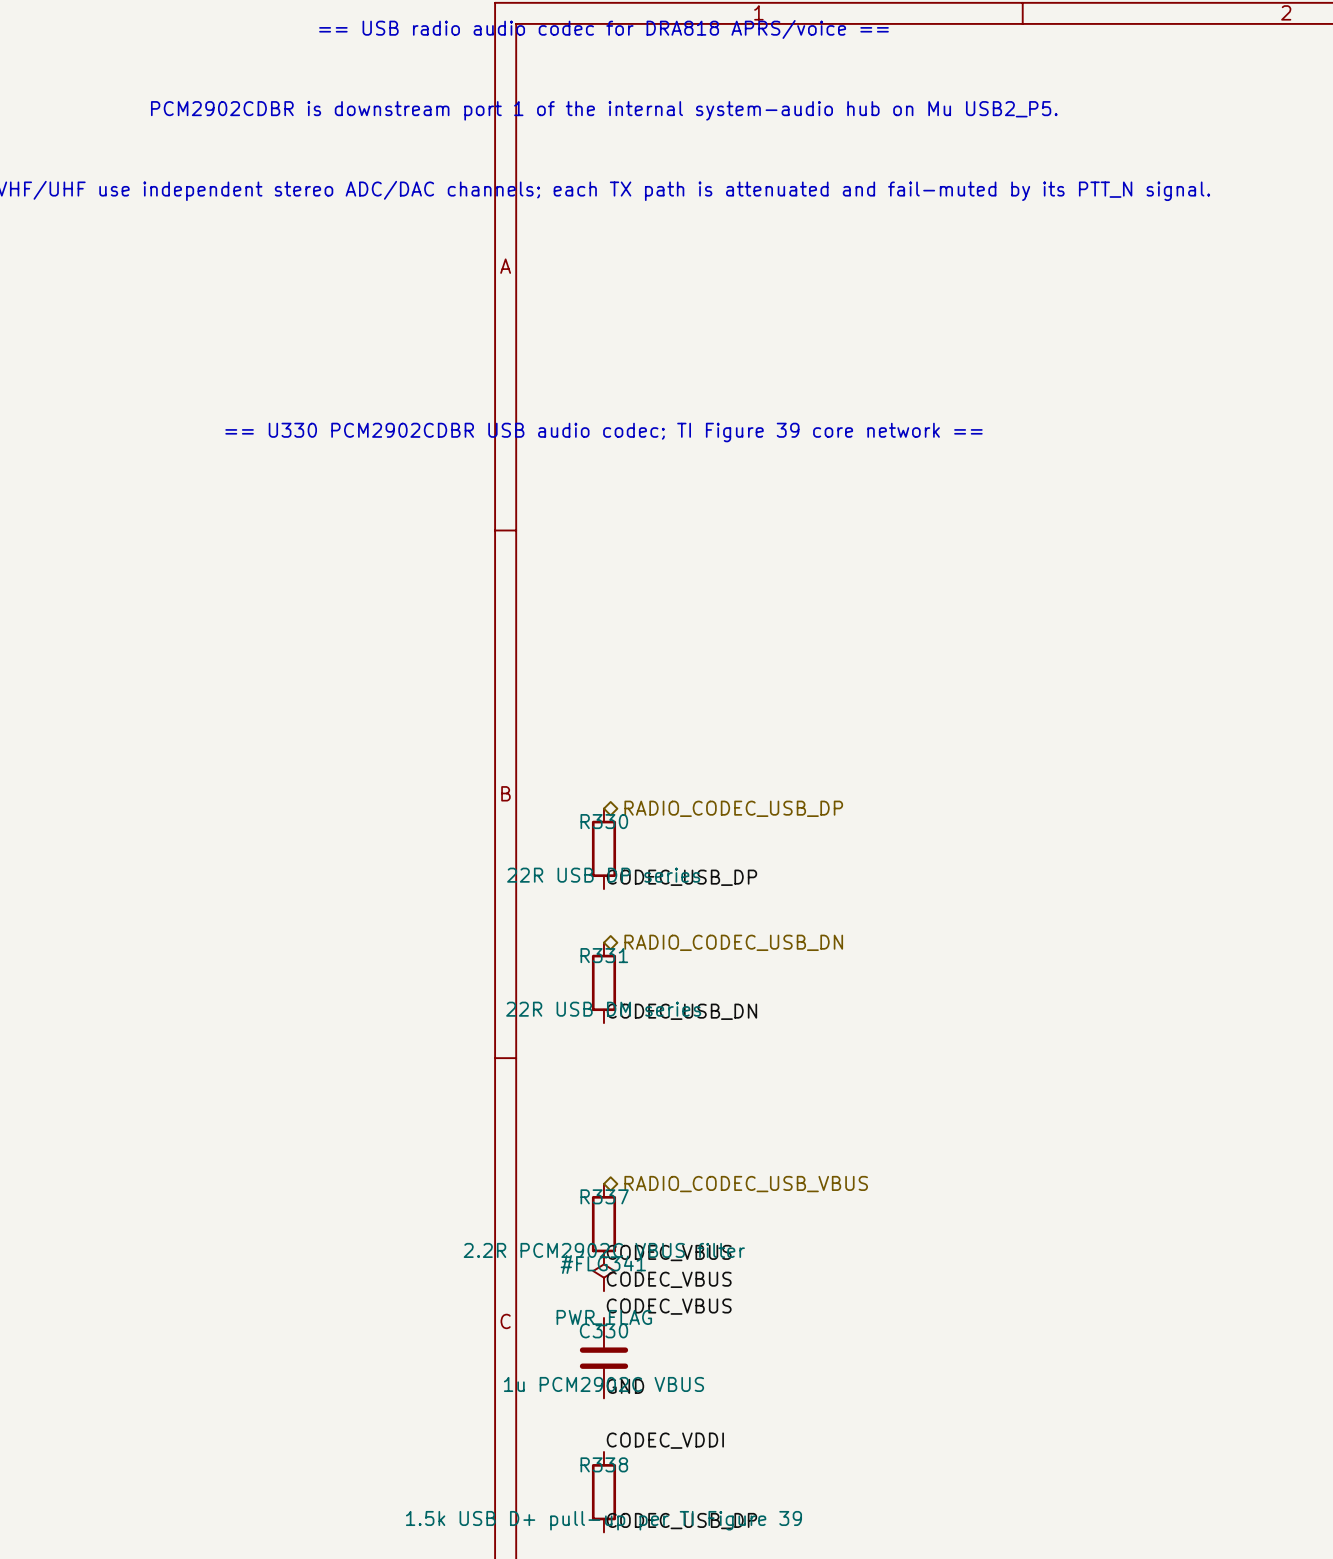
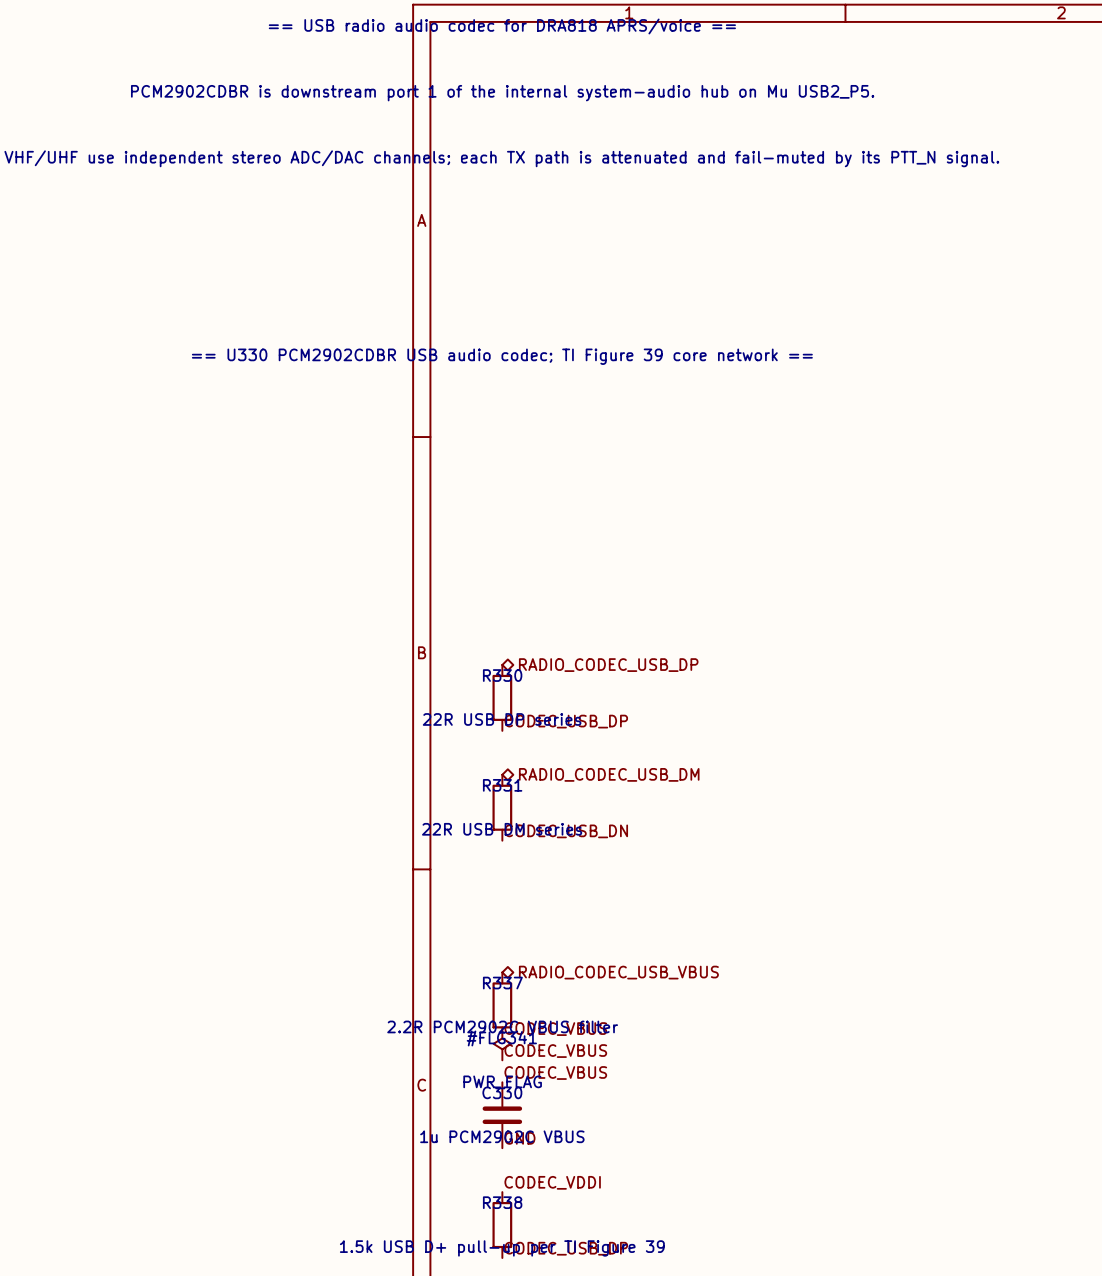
hierarchical label: RADIO_CODEC_USB_DN (733, 942) -> RADIO_CODEC_USB_DM (609, 774)

